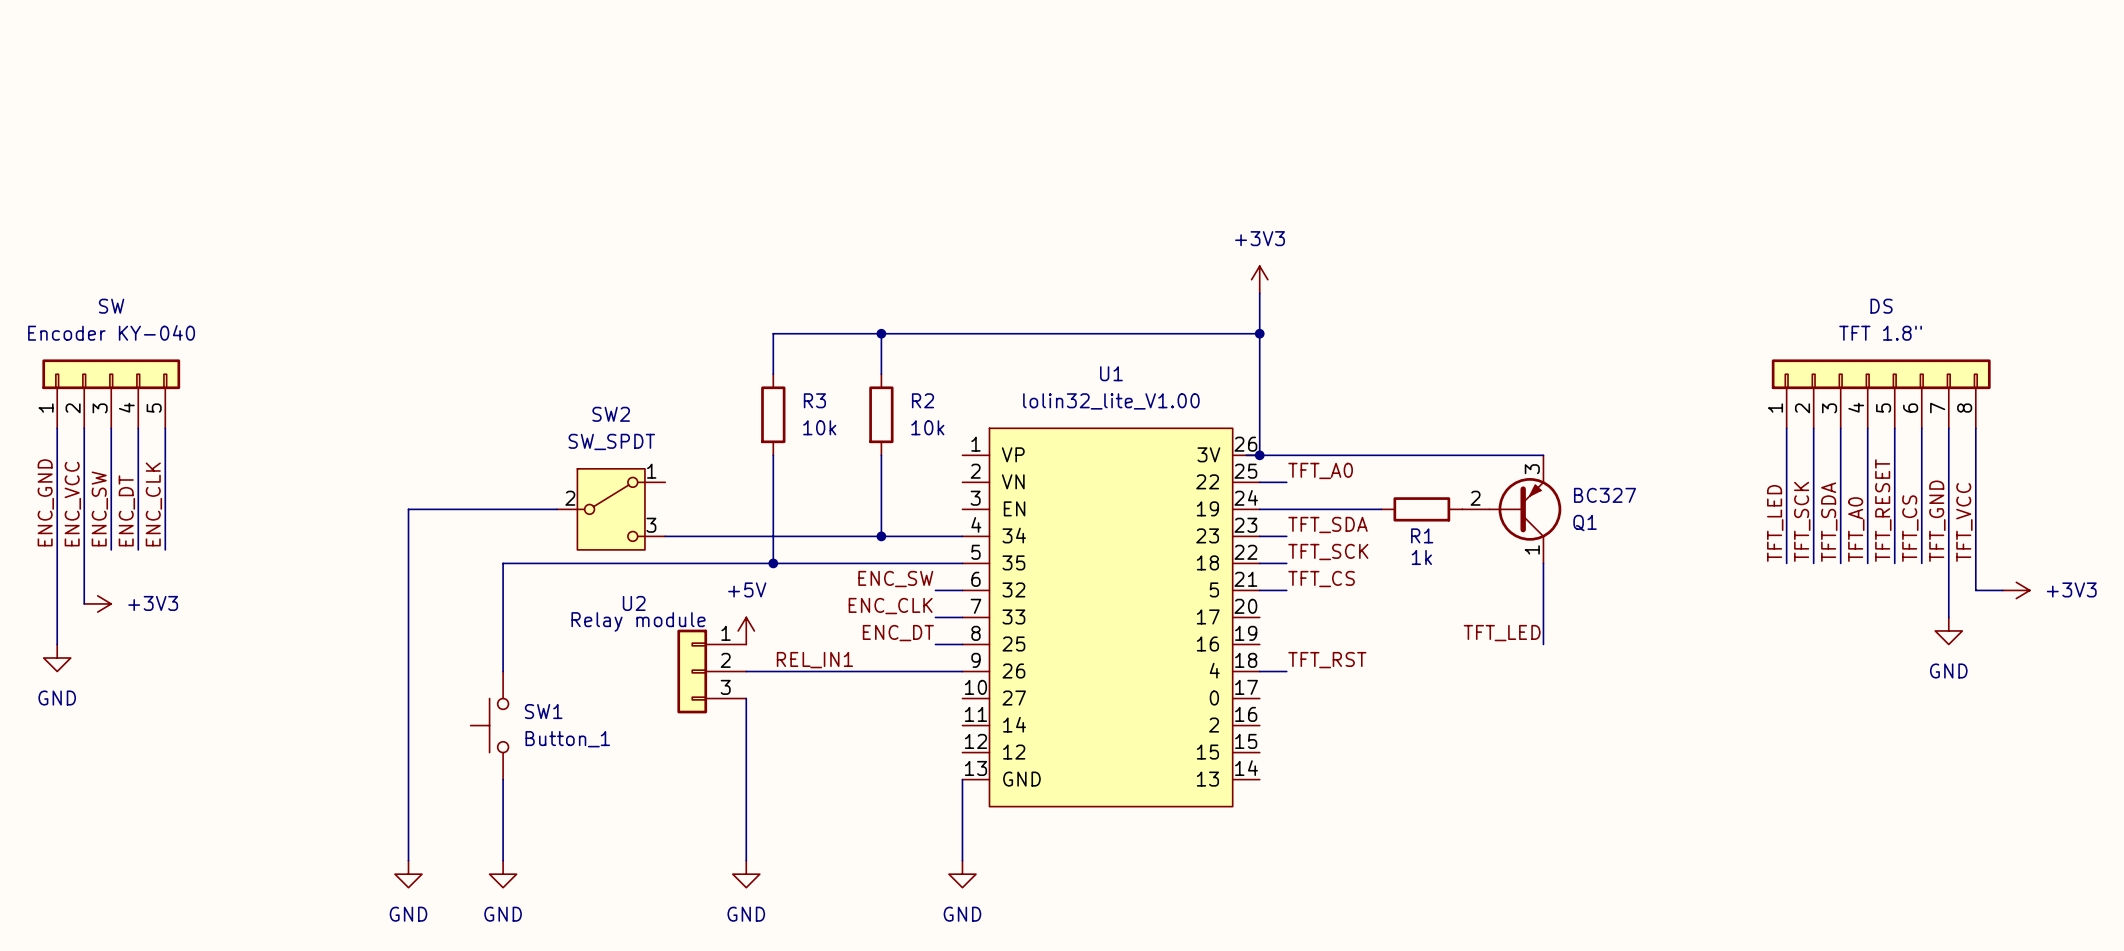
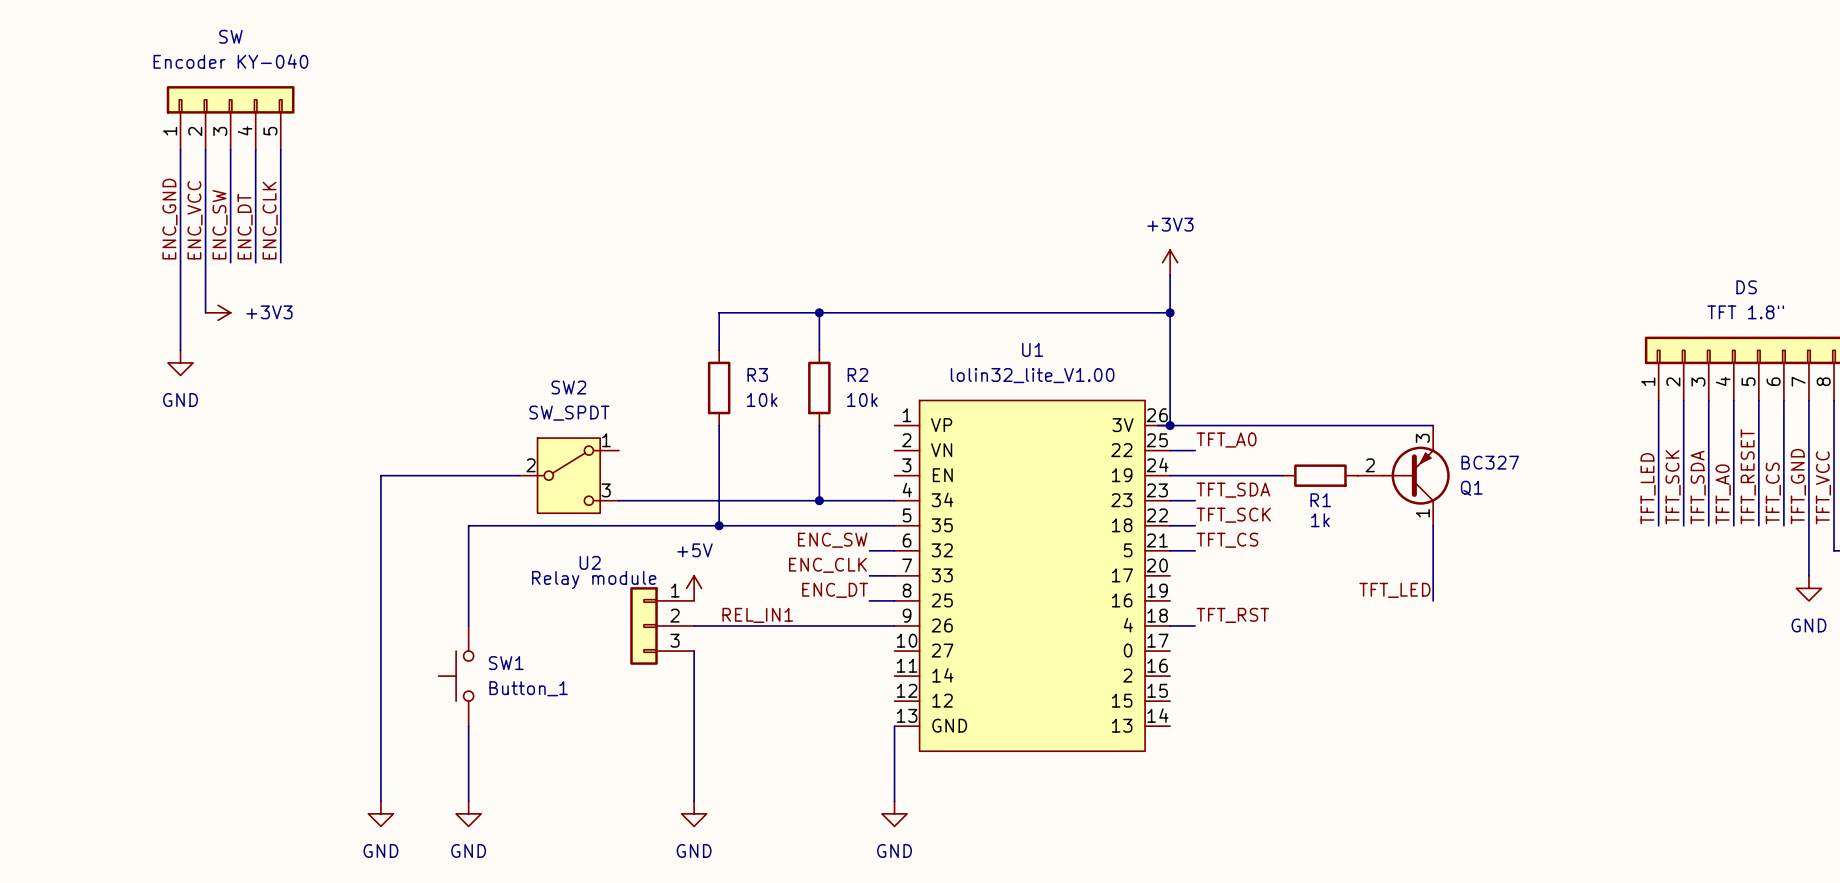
SW: none -> Encoder KY-040 (230, 118)
wire: none -> (180, 149) (180, 350)
wire: none -> (205, 149) (205, 312)
wire: none -> (230, 149) (230, 262)
wire: none -> (255, 149) (255, 262)
wire: none -> (280, 149) (280, 262)
label: none -> ENC_GND (169, 219)
label: none -> ENC_VCC (195, 220)
label: none -> ENC_CLK (270, 220)
label: none -> ENC_SW (220, 224)
label: none -> ENC_DT (245, 226)
power symbol: none -> +3V3 (218, 312)
power symbol: none -> GND (180, 362)
SW: Encoder KY-040 (111, 393) -> none
wire: (57, 428) (57, 644) -> none
wire: (84, 428) (84, 603) -> none
wire: (111, 428) (111, 549) -> none
wire: (138, 428) (138, 549) -> none
wire: (165, 428) (165, 549) -> none
label: ENC_GND (45, 502) -> none
label: ENC_VCC (72, 504) -> none
label: ENC_CLK (153, 504) -> none
label: ENC_SW (99, 508) -> none
label: ENC_DT (126, 510) -> none
power symbol: +3V3 (97, 603) -> none
power symbol: GND (57, 658) -> none

